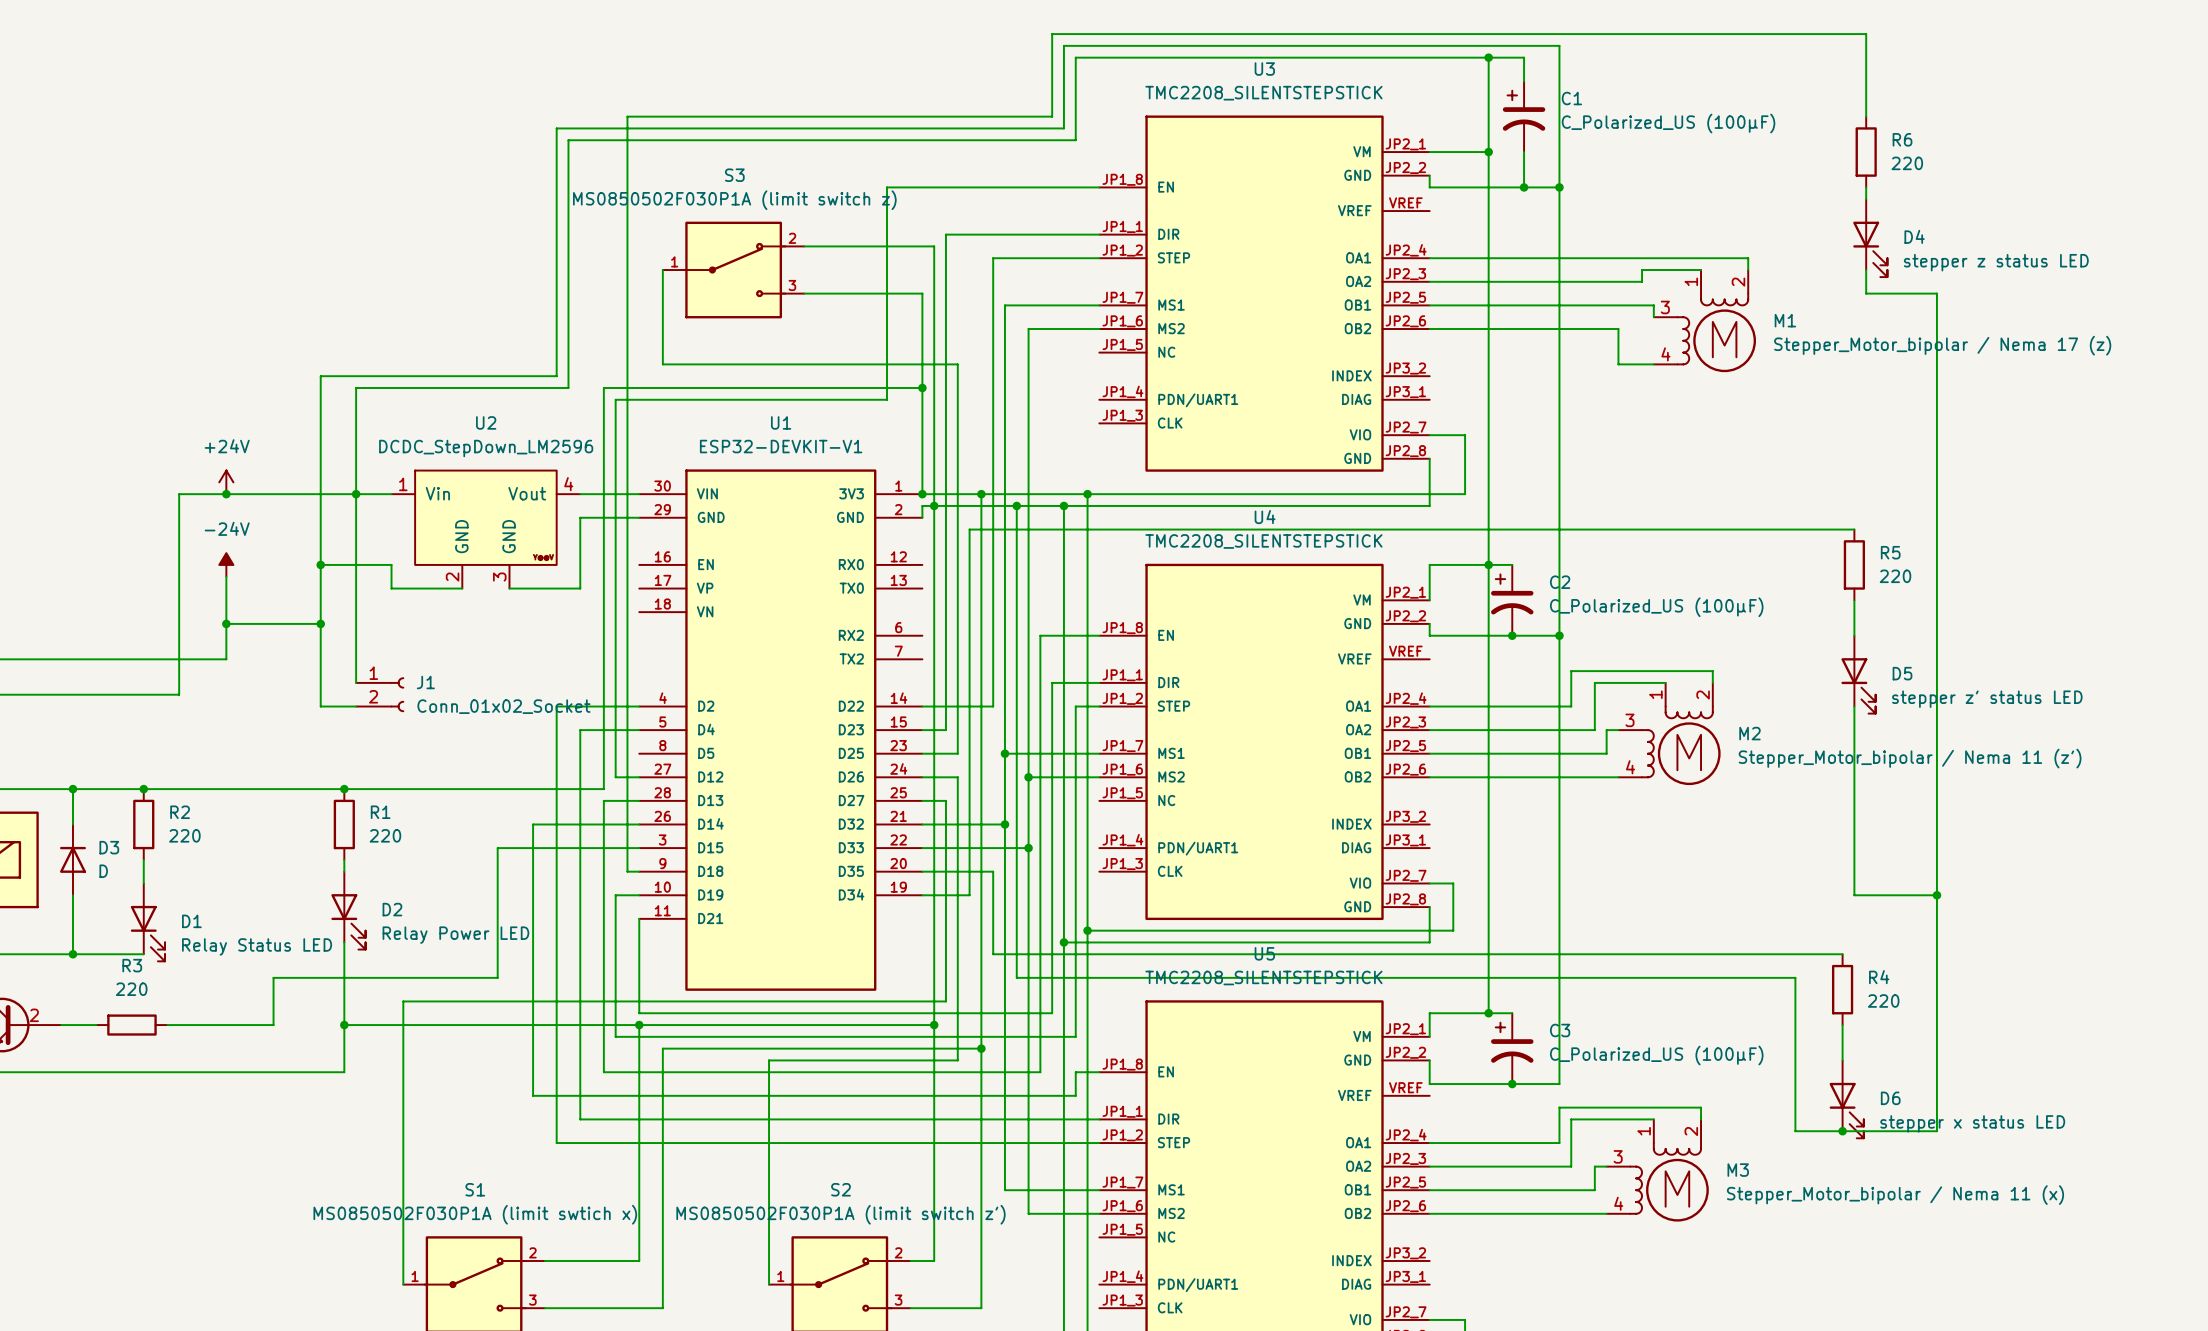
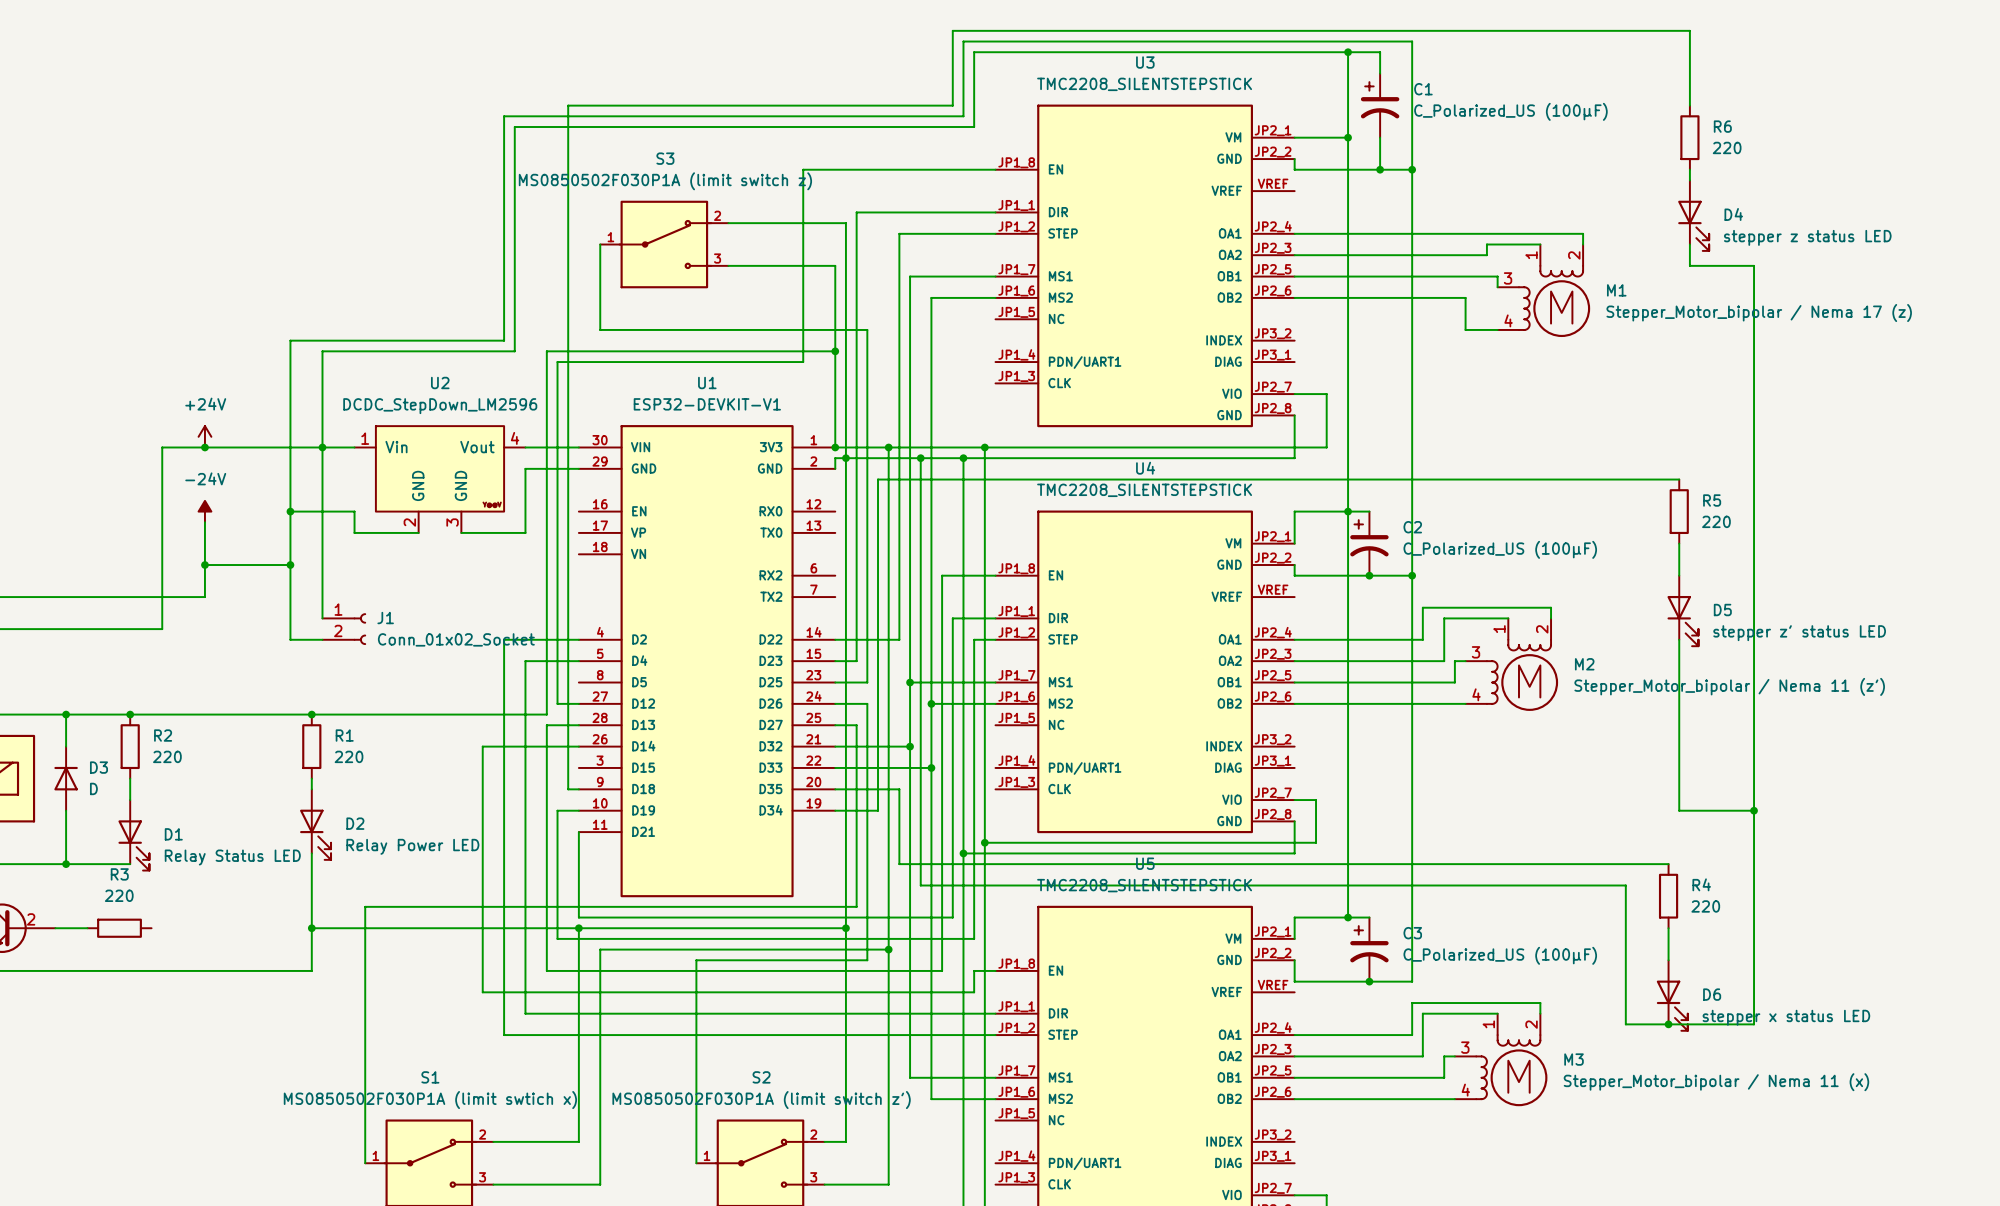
wire: (639, 848) (497, 848) (497, 977) (273, 977) (273, 1025) (167, 1025) -> none

